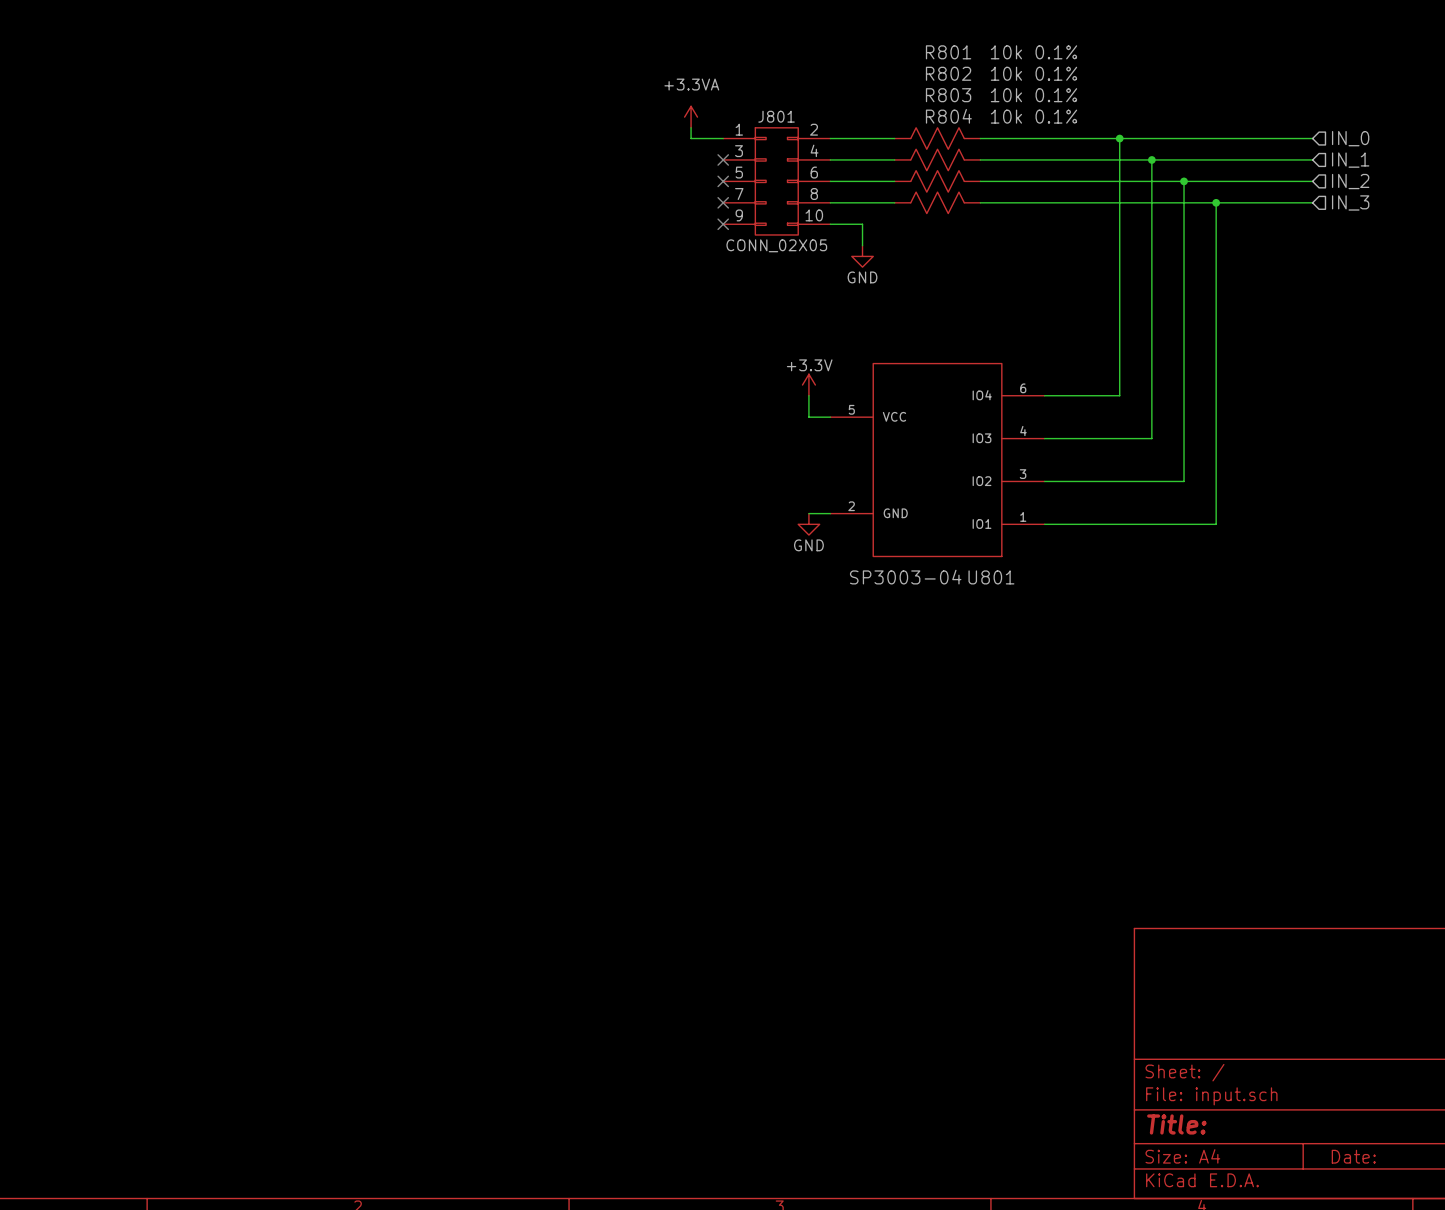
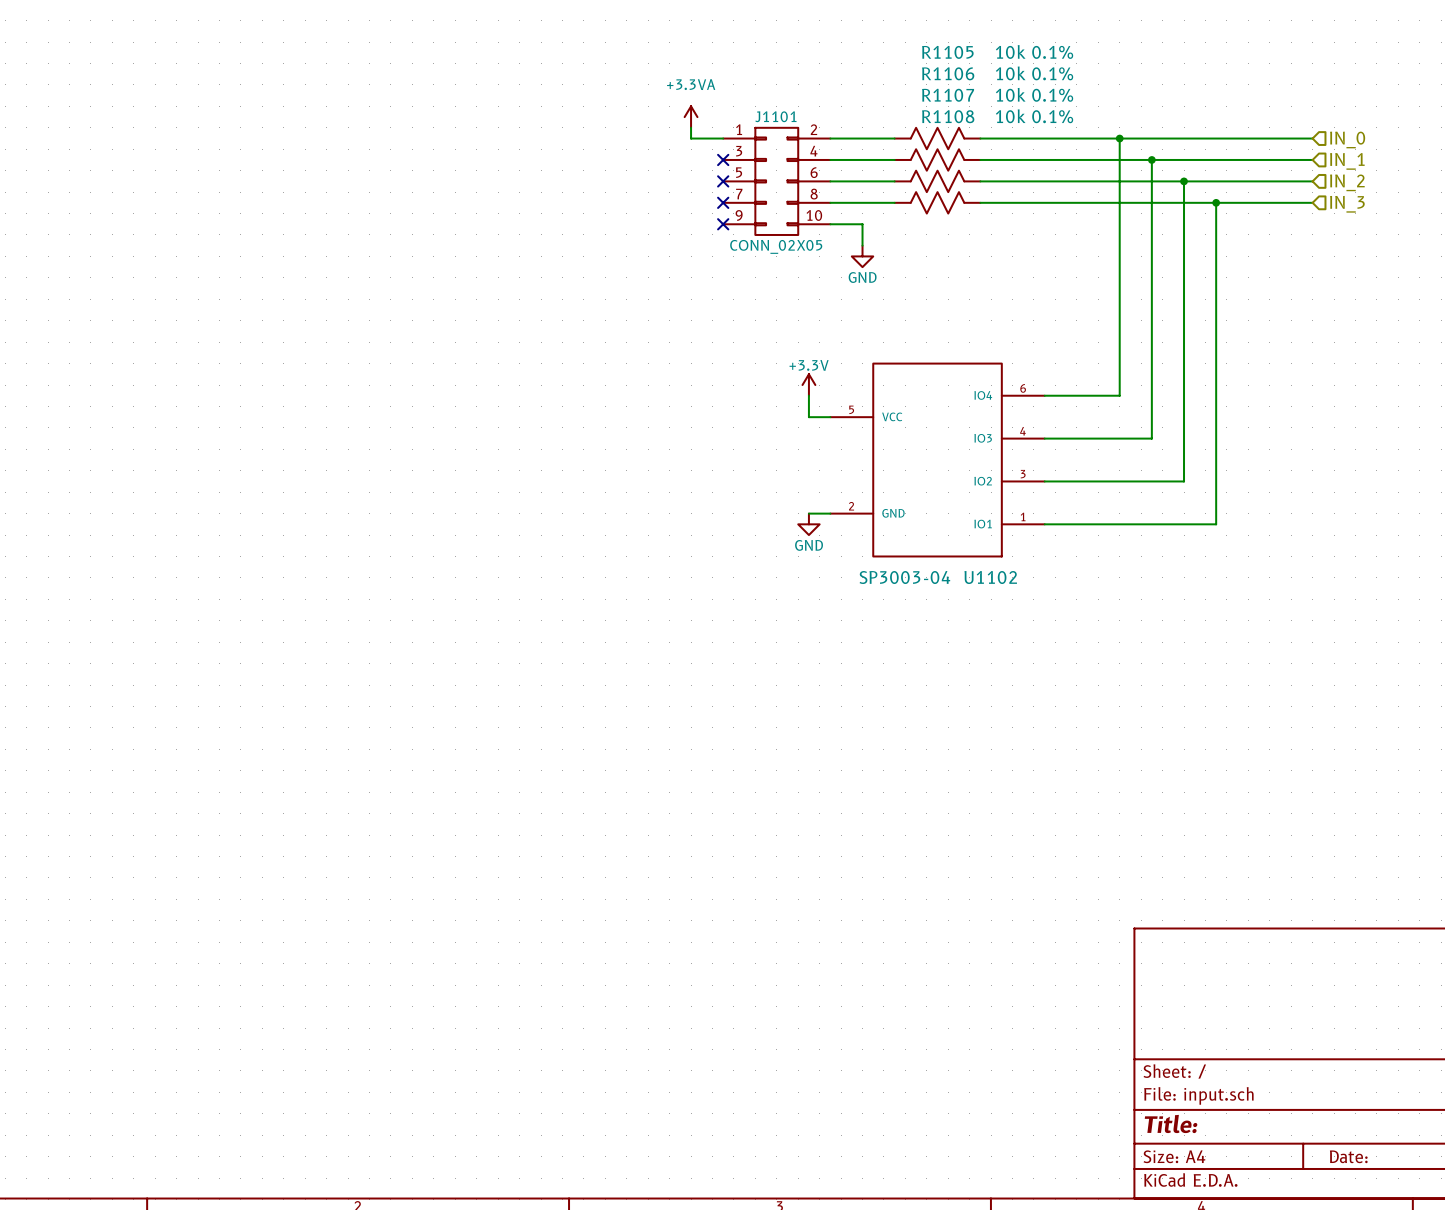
R801 name: R801 (948, 52) -> R1105 (947, 52)
R802 name: R802 (948, 73) -> R1106 (948, 73)
R803 name: R803 (948, 95) -> R1107 (948, 95)
J801 name: J801 (776, 116) -> J1101 (775, 116)
R804 name: R804 (948, 116) -> R1108 (948, 116)
U801 name: U801 (991, 577) -> U1102 (990, 577)

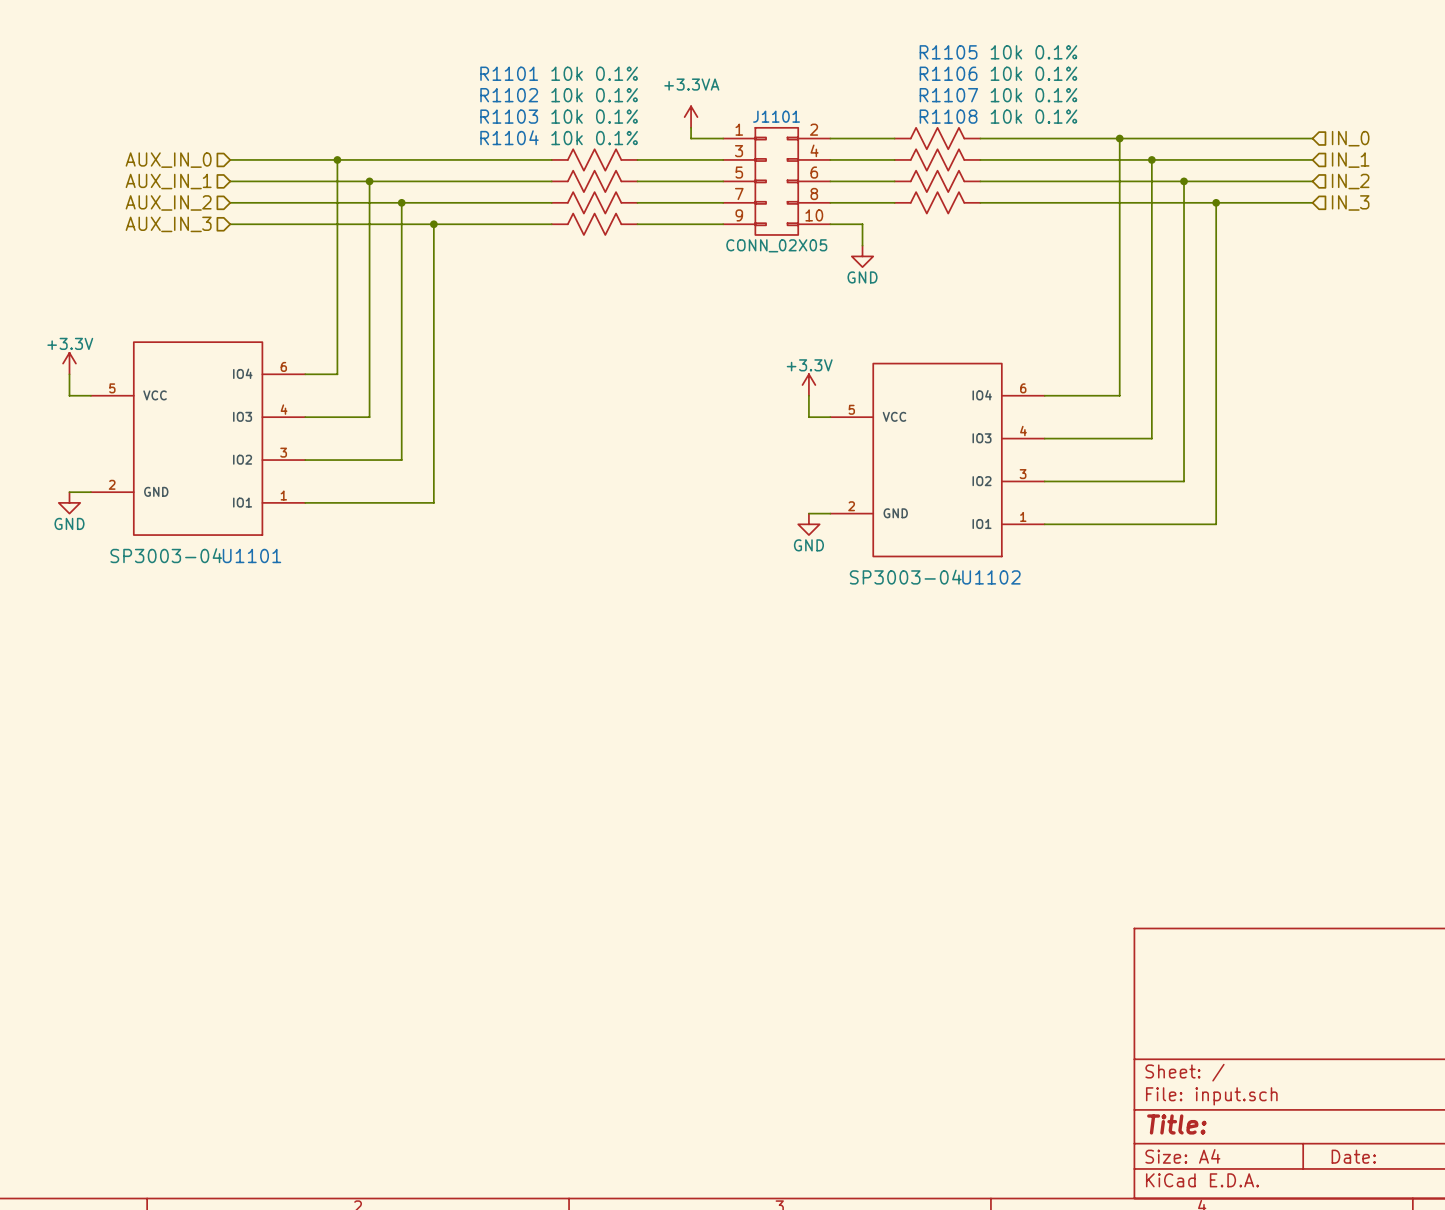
wire: none -> (230, 159) (551, 159)
wire: none -> (337, 159) (337, 374) (305, 374)
junction: none -> (337, 159)
R1101: none -> 10k 0.1% (594, 159)
wire: none -> (637, 159) (723, 159)
no-connect mark: (723, 159) -> none
hierarchical label: none -> AUX_IN_0 (168, 160)
wire: none -> (230, 181) (551, 181)
wire: none -> (369, 181) (369, 417) (305, 417)
junction: none -> (369, 181)
R1102: none -> 10k 0.1% (594, 181)
wire: none -> (637, 181) (723, 181)
no-connect mark: (723, 181) -> none
hierarchical label: none -> AUX_IN_1 (168, 181)
wire: none -> (230, 202) (551, 202)
wire: none -> (401, 202) (401, 460) (305, 460)
junction: none -> (401, 202)
R1103: none -> 10k 0.1% (594, 202)
wire: none -> (637, 202) (723, 202)
no-connect mark: (723, 202) -> none
hierarchical label: none -> AUX_IN_2 (168, 202)
wire: none -> (230, 224) (551, 224)
wire: none -> (433, 224) (433, 502) (305, 502)
junction: none -> (433, 224)
R1104: none -> 10k 0.1% (594, 224)
wire: none -> (637, 224) (723, 224)
no-connect mark: (723, 224) -> none
hierarchical label: none -> AUX_IN_3 (168, 224)
power symbol: none -> +3.3V (69, 363)
wire: none -> (69, 374) (69, 395) (90, 395)
U1101: none -> SP3003-04 (198, 438)
wire: none -> (69, 492) (90, 492)
power symbol: none -> GND (69, 502)

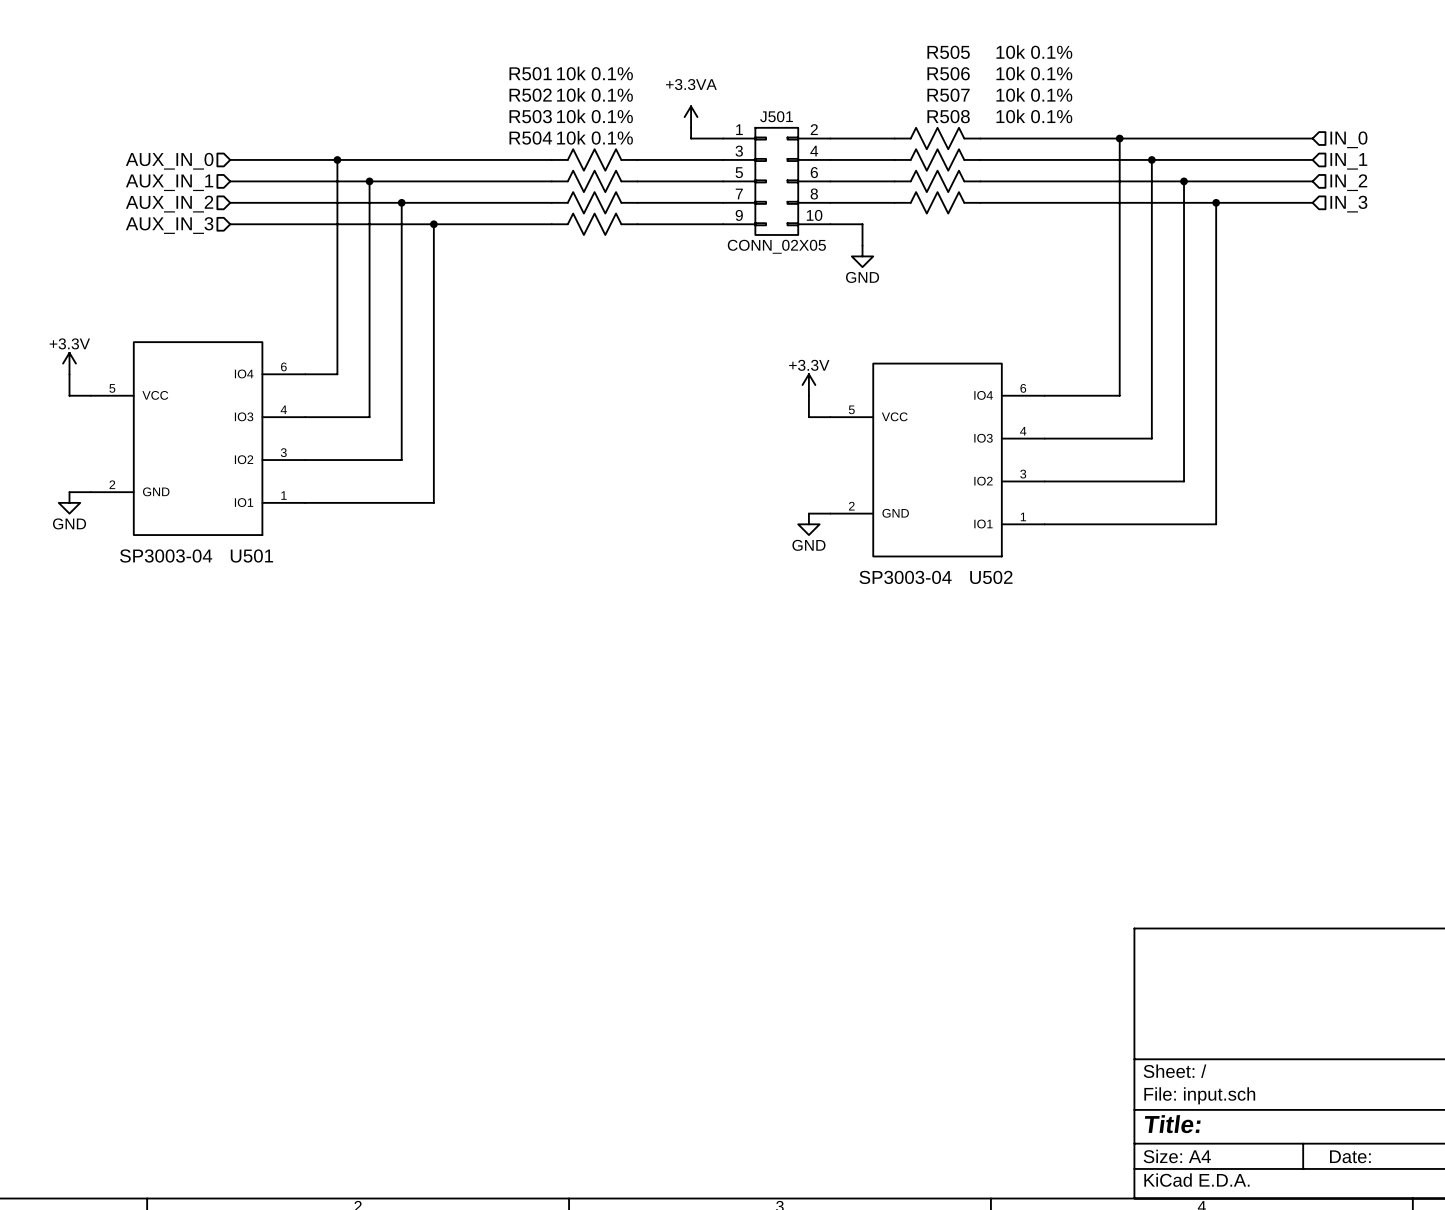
R1105 name: R1105 (948, 52) -> R505 (948, 52)
R1101 name: R1101 (509, 73) -> R501 (530, 73)
R1106 name: R1106 (948, 73) -> R506 (948, 73)
R1102 name: R1102 (509, 95) -> R502 (530, 95)
R1107 name: R1107 (948, 95) -> R507 (948, 95)
R1103 name: R1103 (509, 116) -> R503 (530, 116)
J1101 name: J1101 (776, 116) -> J501 (776, 116)
R1108 name: R1108 (948, 116) -> R508 (948, 116)
R1104 name: R1104 (509, 137) -> R504 (530, 138)
U1101 name: U1101 (251, 555) -> U501 (251, 555)
U1102 name: U1102 (991, 577) -> U502 (991, 577)

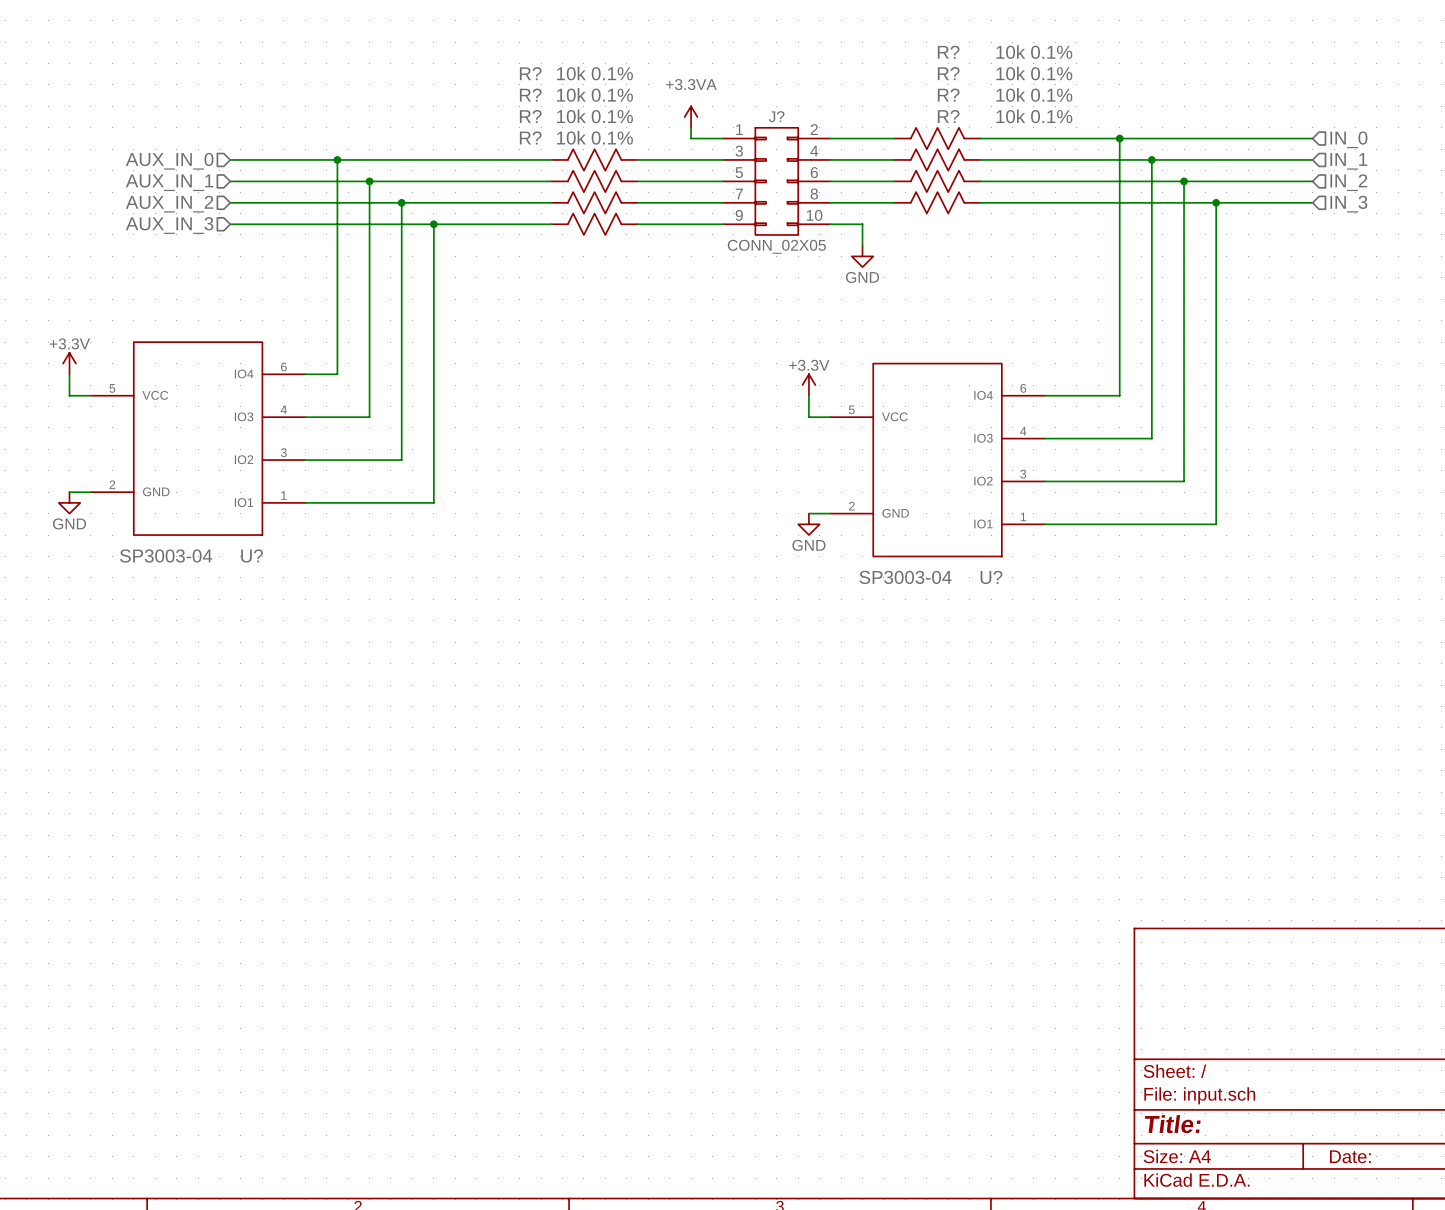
R505 name: R505 (948, 52) -> R? (948, 52)
R501 name: R501 (530, 73) -> R? (530, 73)
R506 name: R506 (948, 73) -> R? (948, 73)
R502 name: R502 (530, 95) -> R? (530, 95)
R507 name: R507 (948, 95) -> R? (948, 95)
R503 name: R503 (530, 116) -> R? (530, 116)
J501 name: J501 (776, 116) -> J? (776, 116)
R508 name: R508 (948, 116) -> R? (948, 116)
R504 name: R504 (530, 138) -> R? (530, 137)
U501 name: U501 (251, 555) -> U? (252, 555)
U502 name: U502 (991, 577) -> U? (991, 577)

